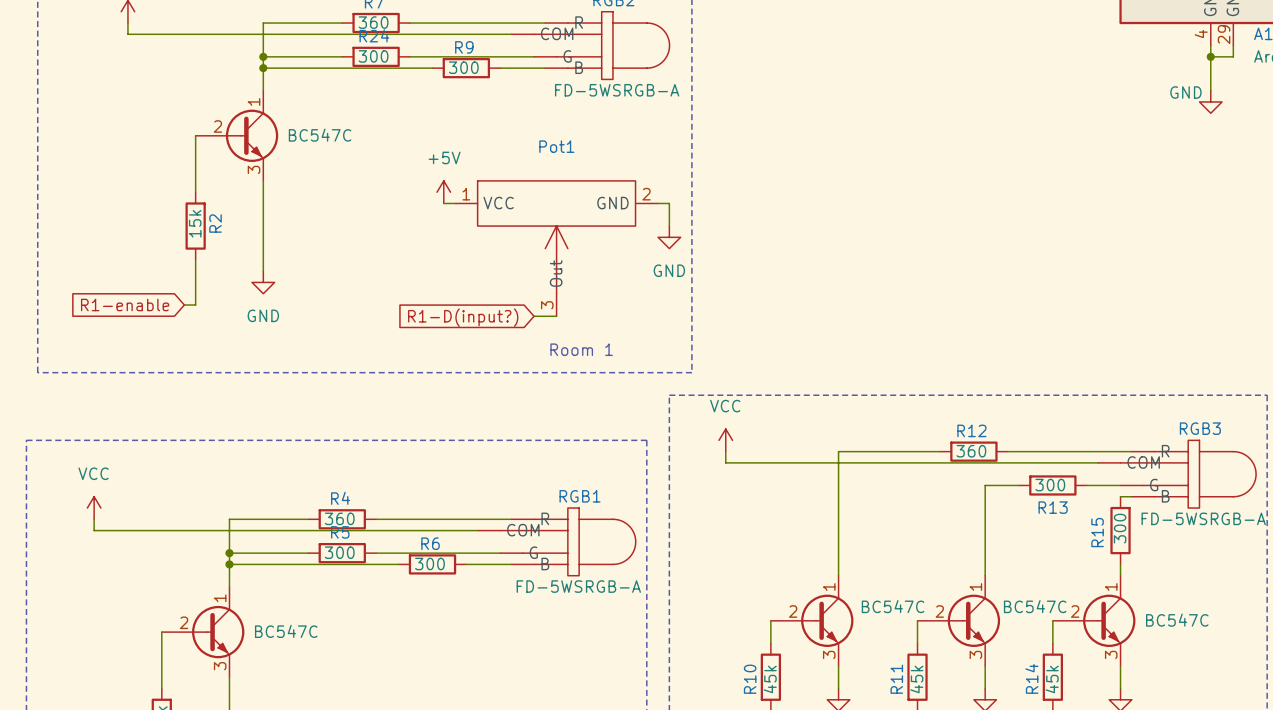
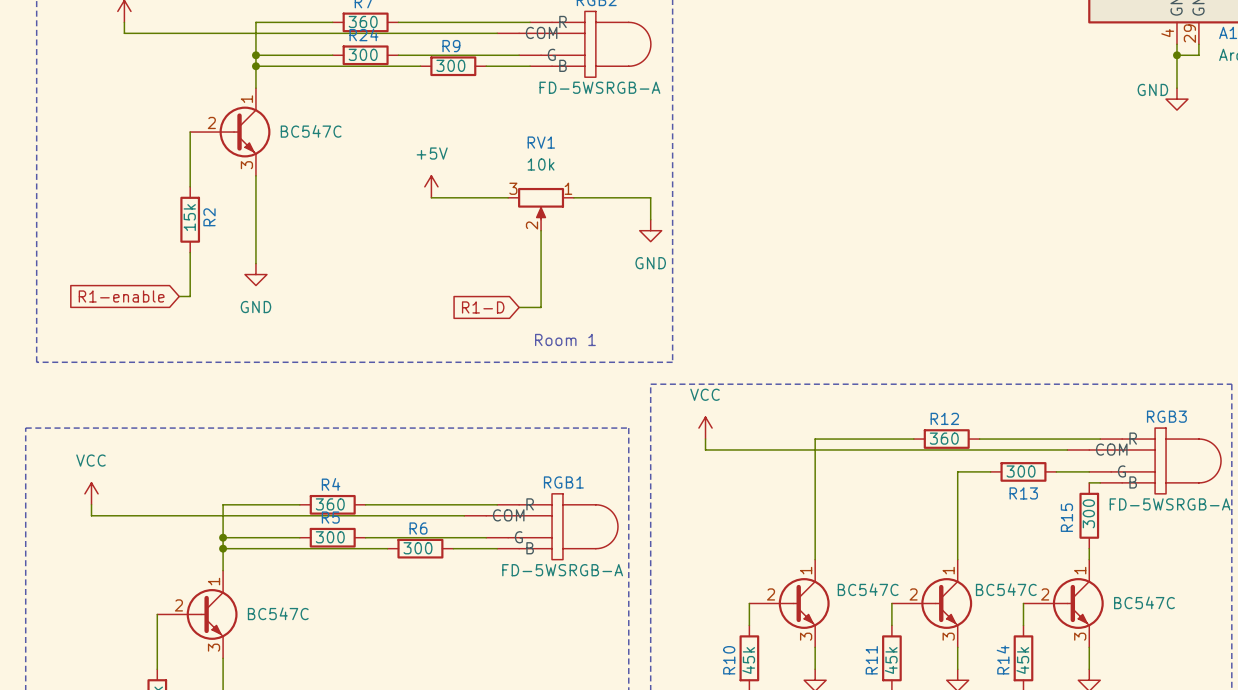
wire: none -> (442, 197) (508, 197)
RV1: none -> 10k (541, 209)
Pot1: (556, 248) -> none
global label: R1-D(input?) (463, 317) -> R1-D (483, 307)

